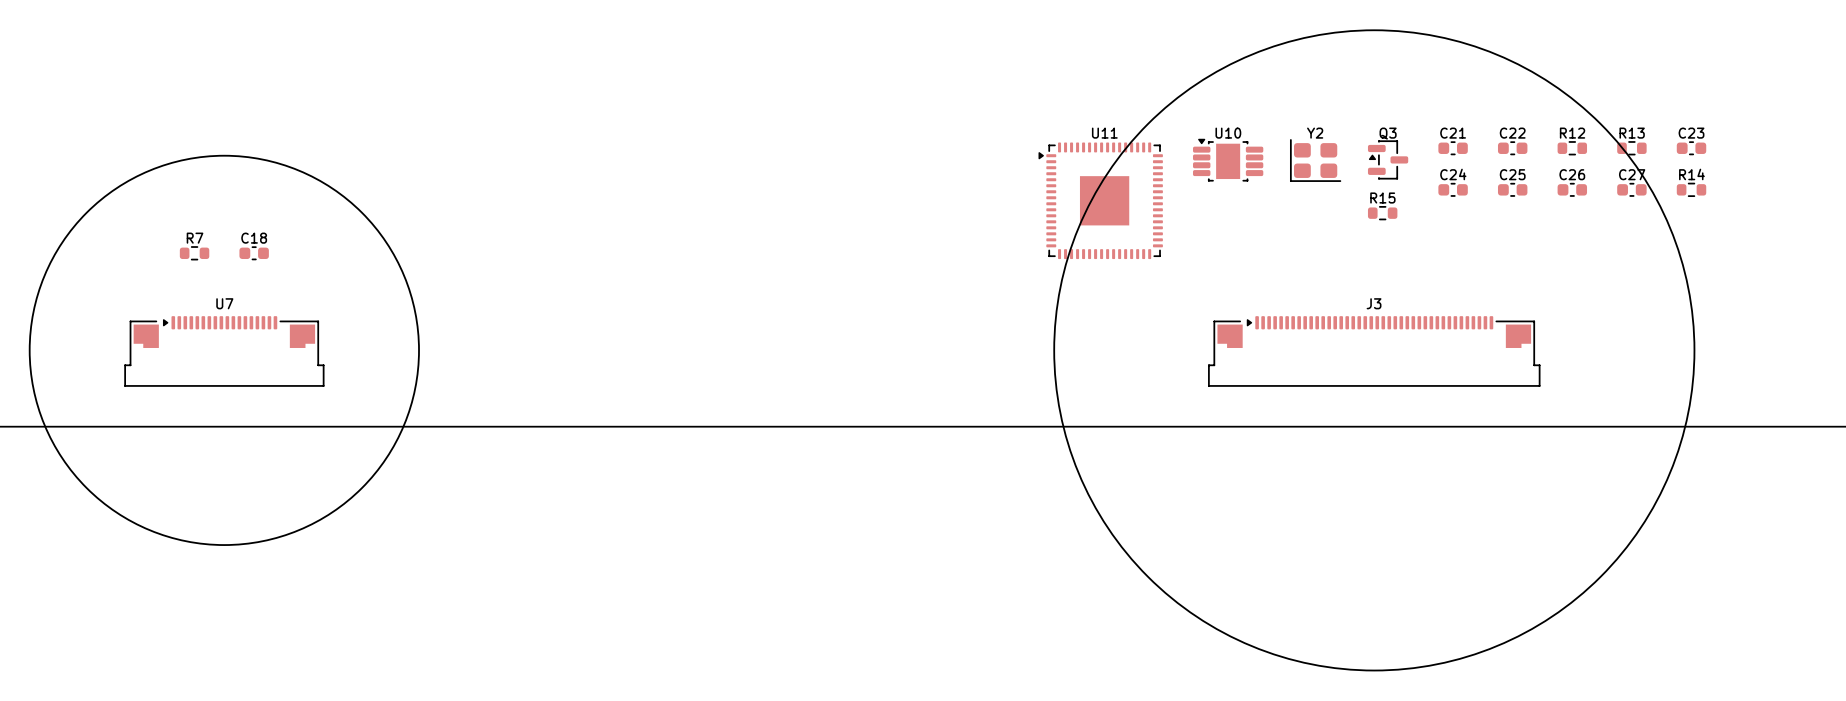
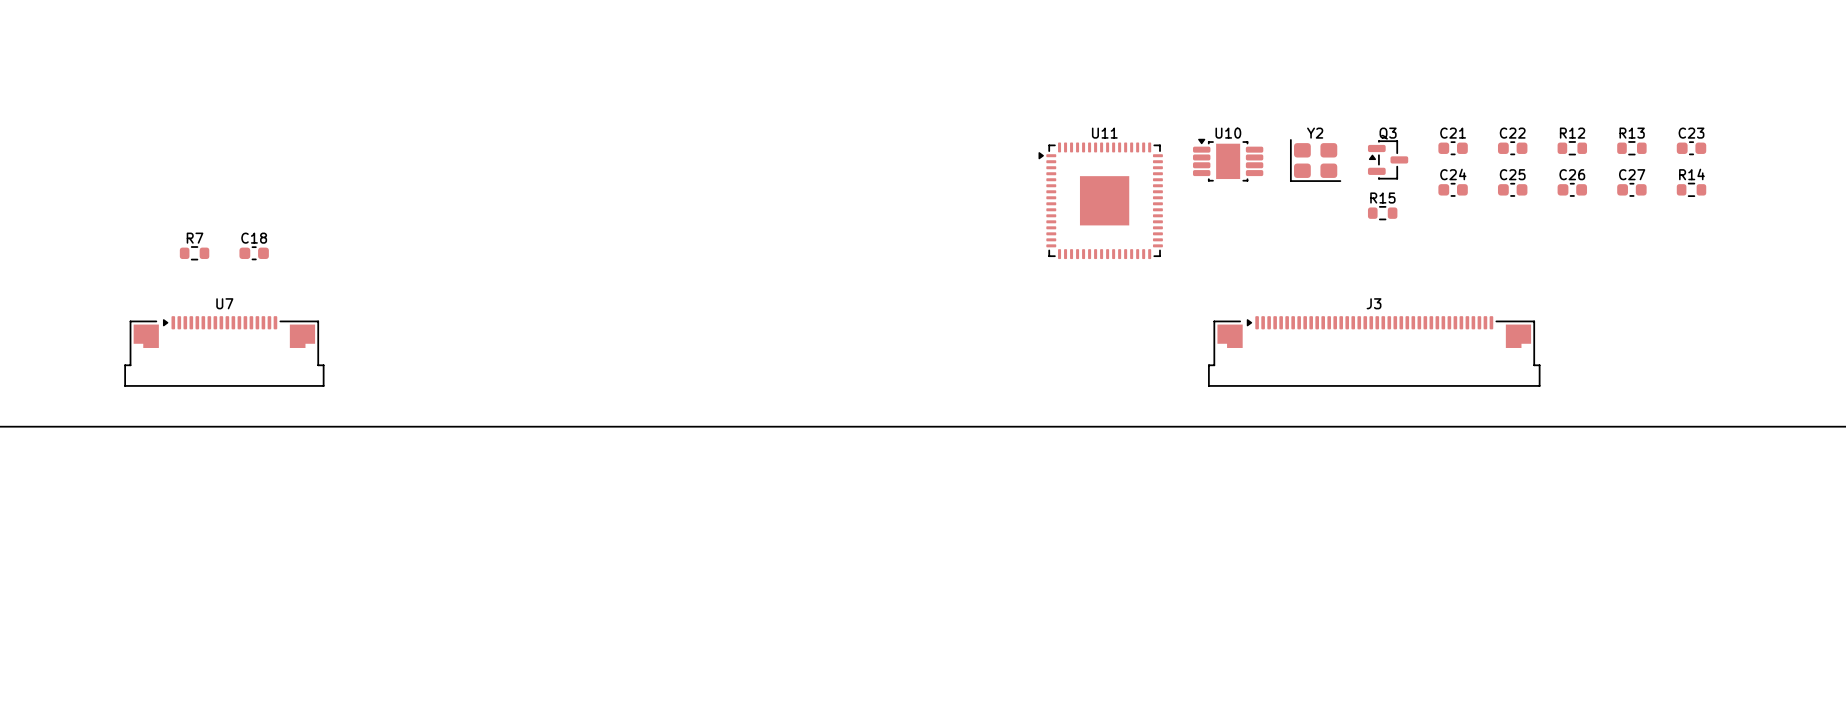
drawing: [1053, 29, 1696, 672] -> none
drawing: [28, 154, 420, 546] -> none

